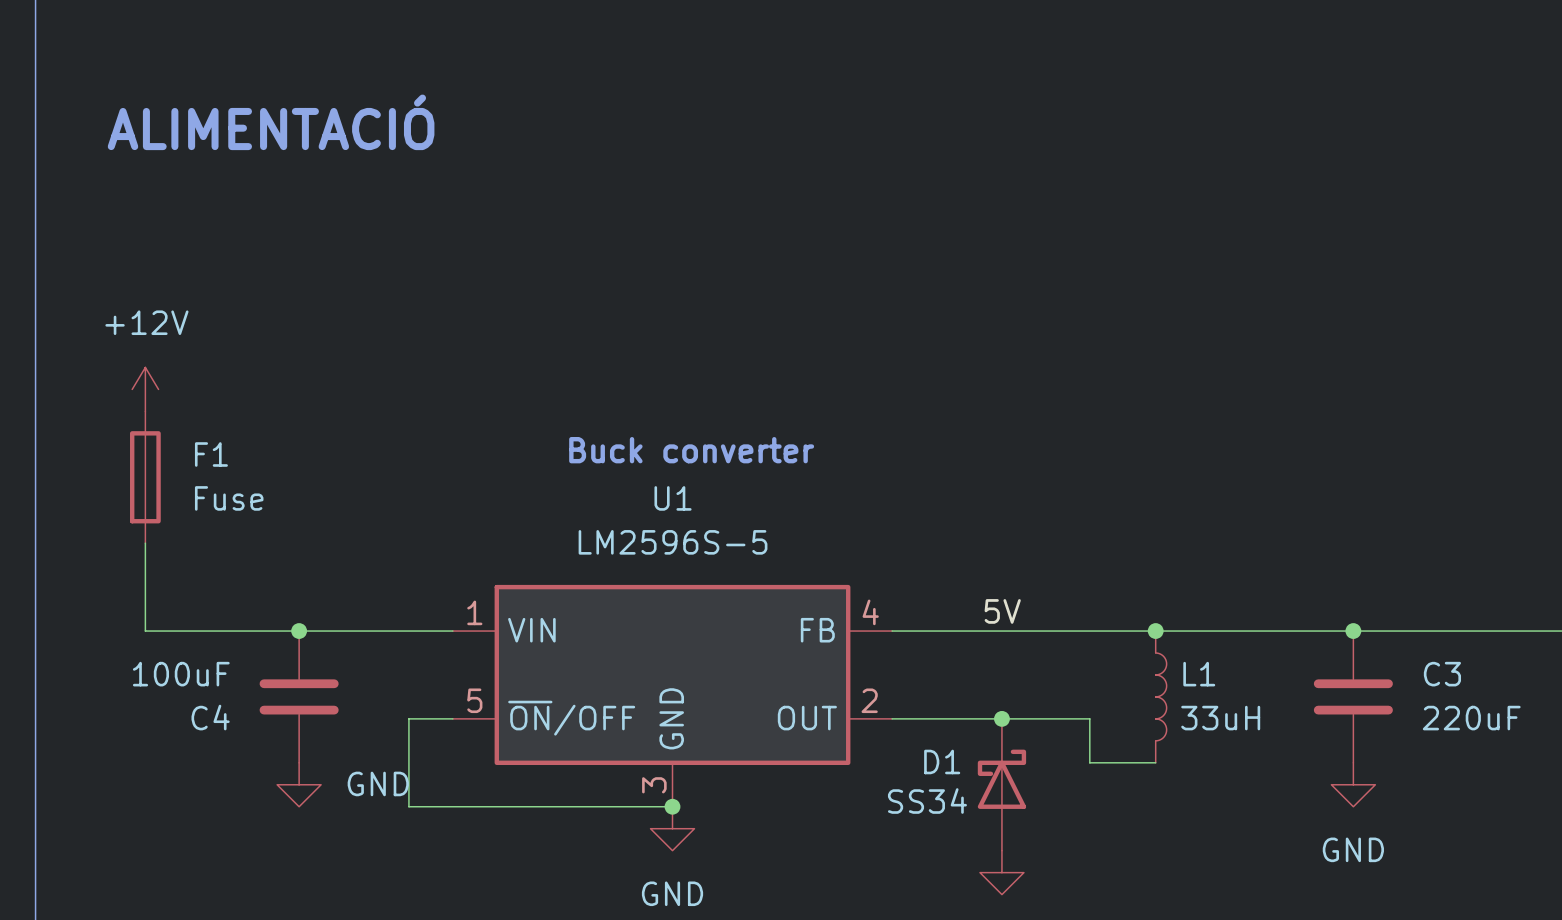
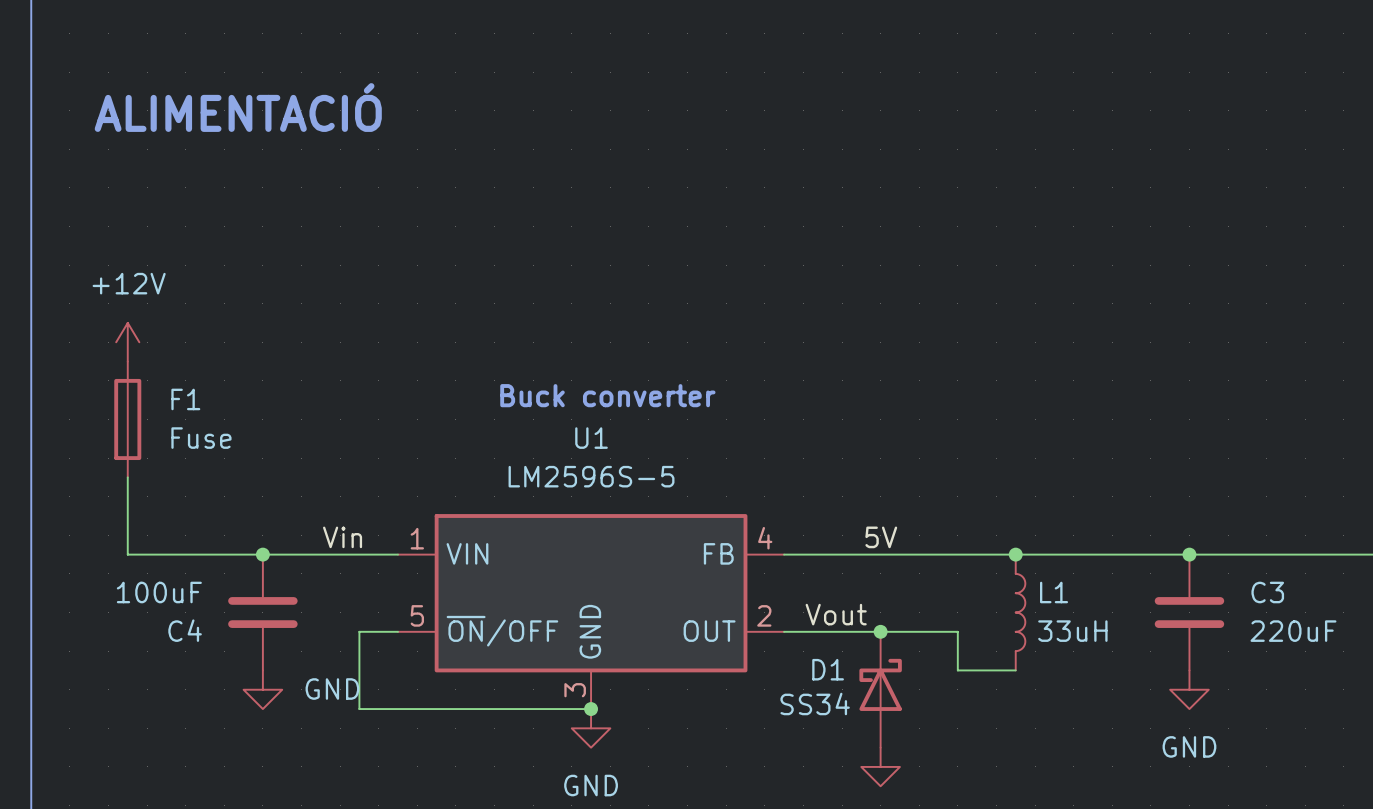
label: none -> Vin (342, 537)
label: none -> Vout (836, 614)

